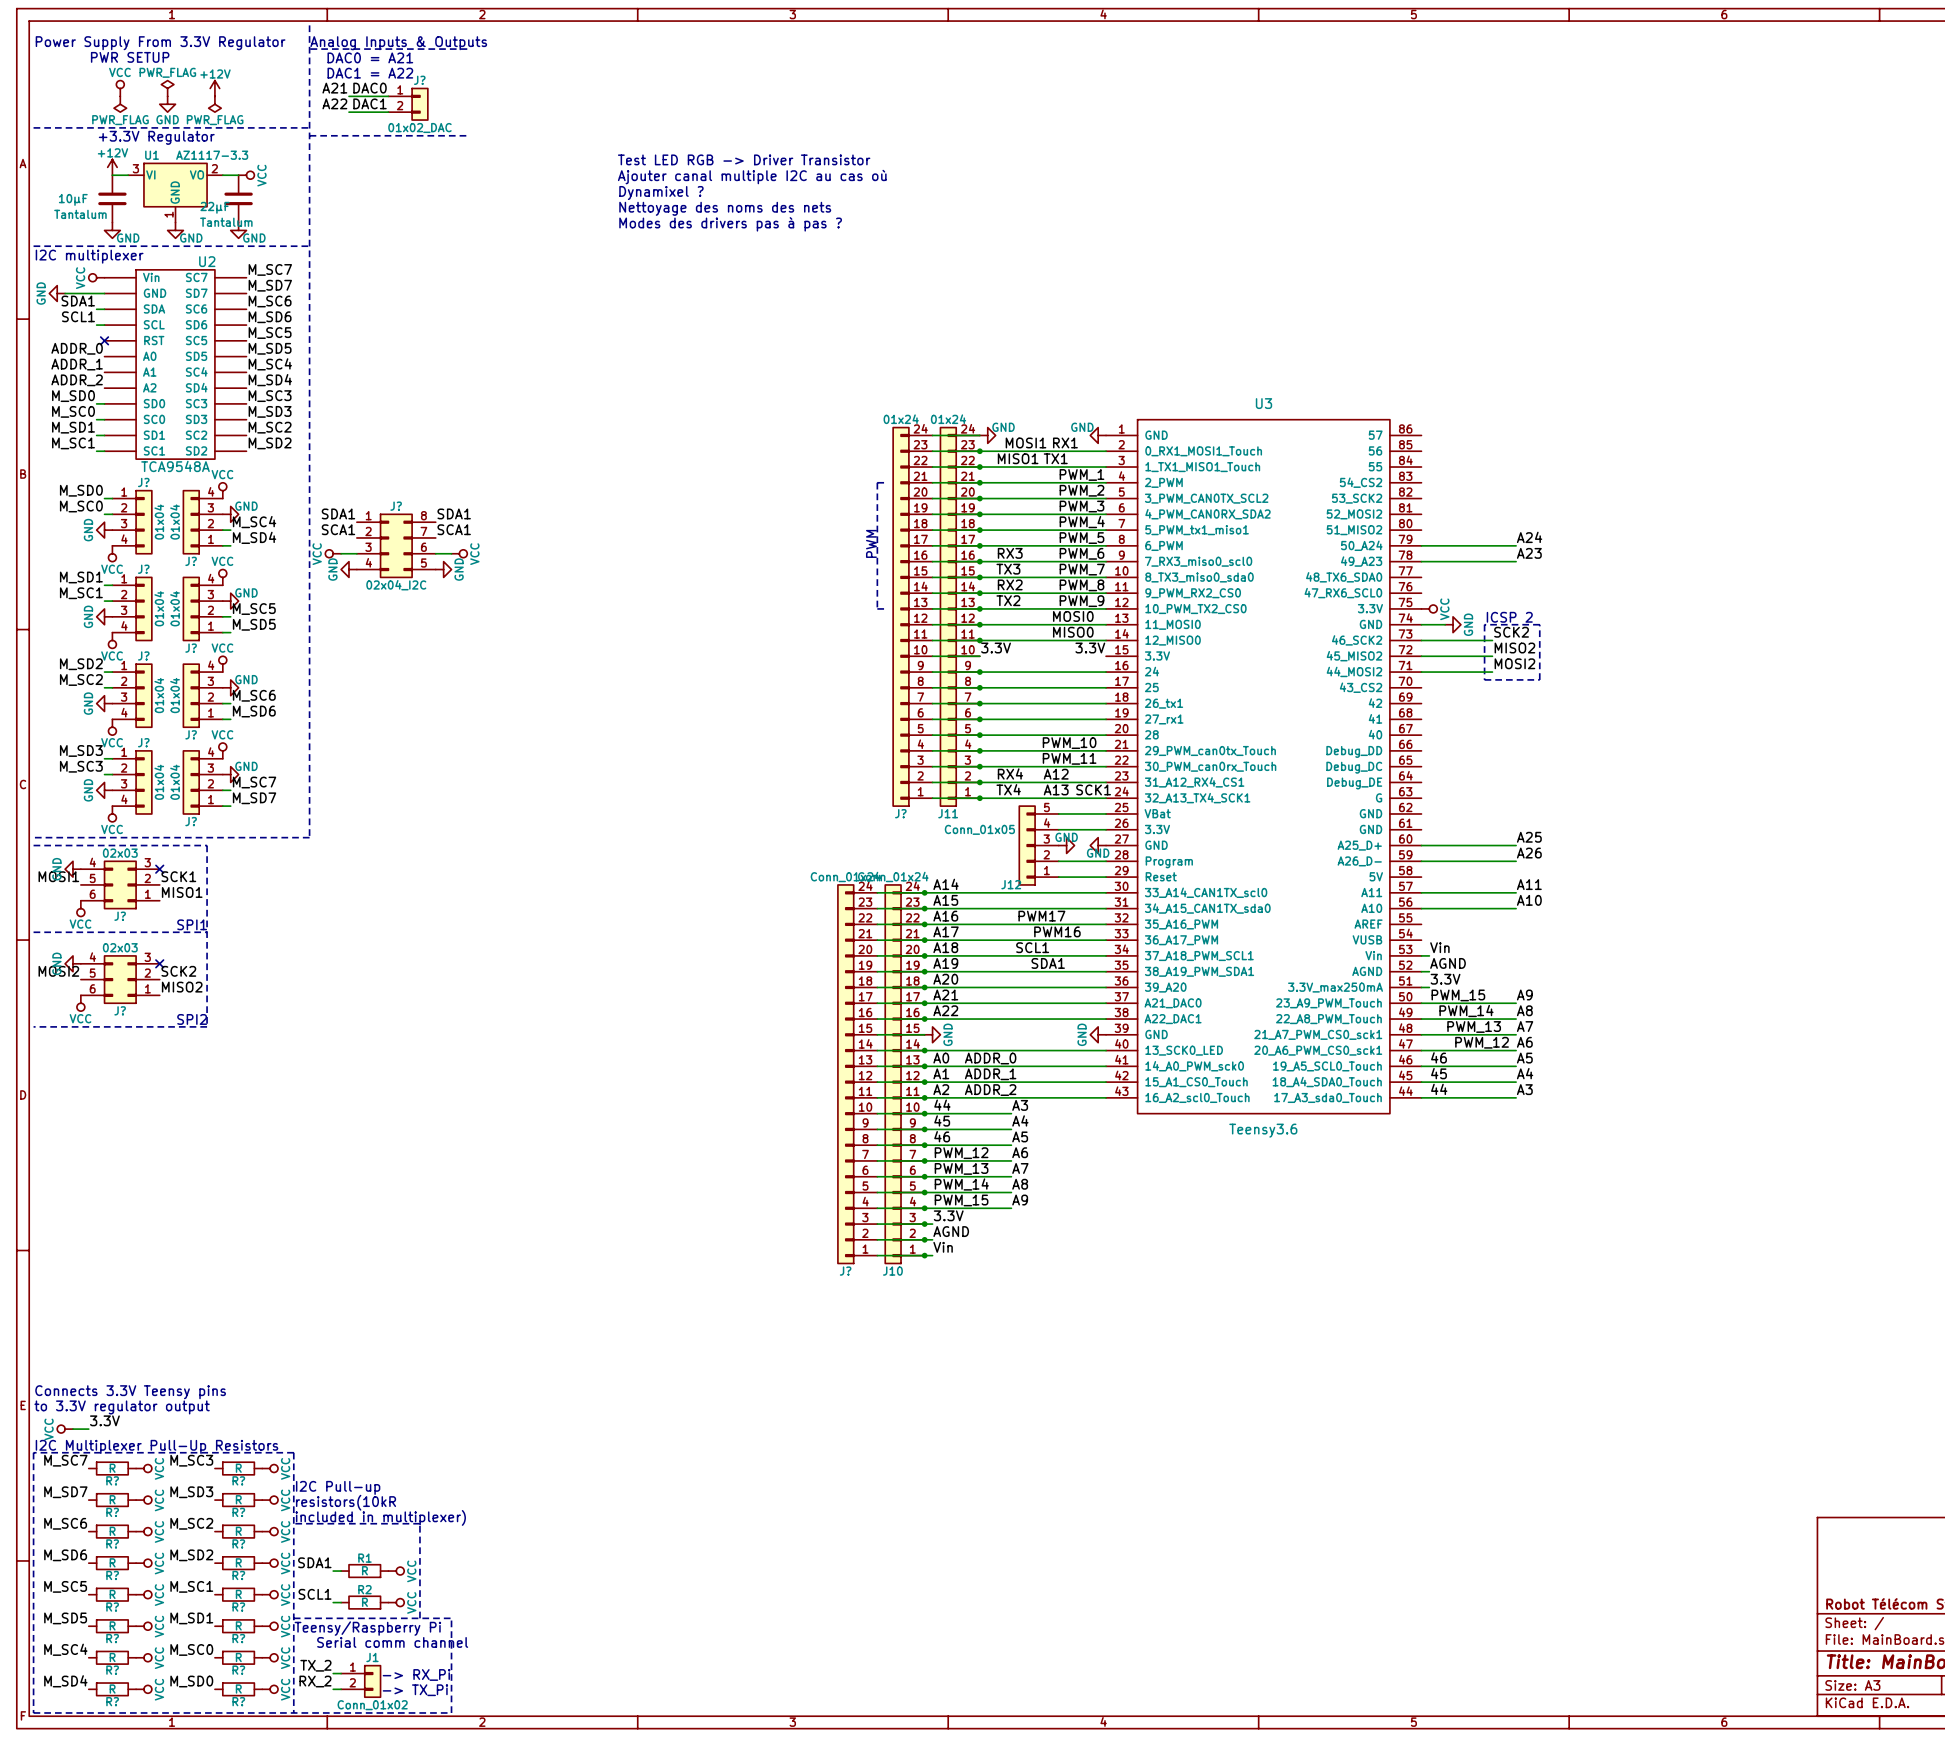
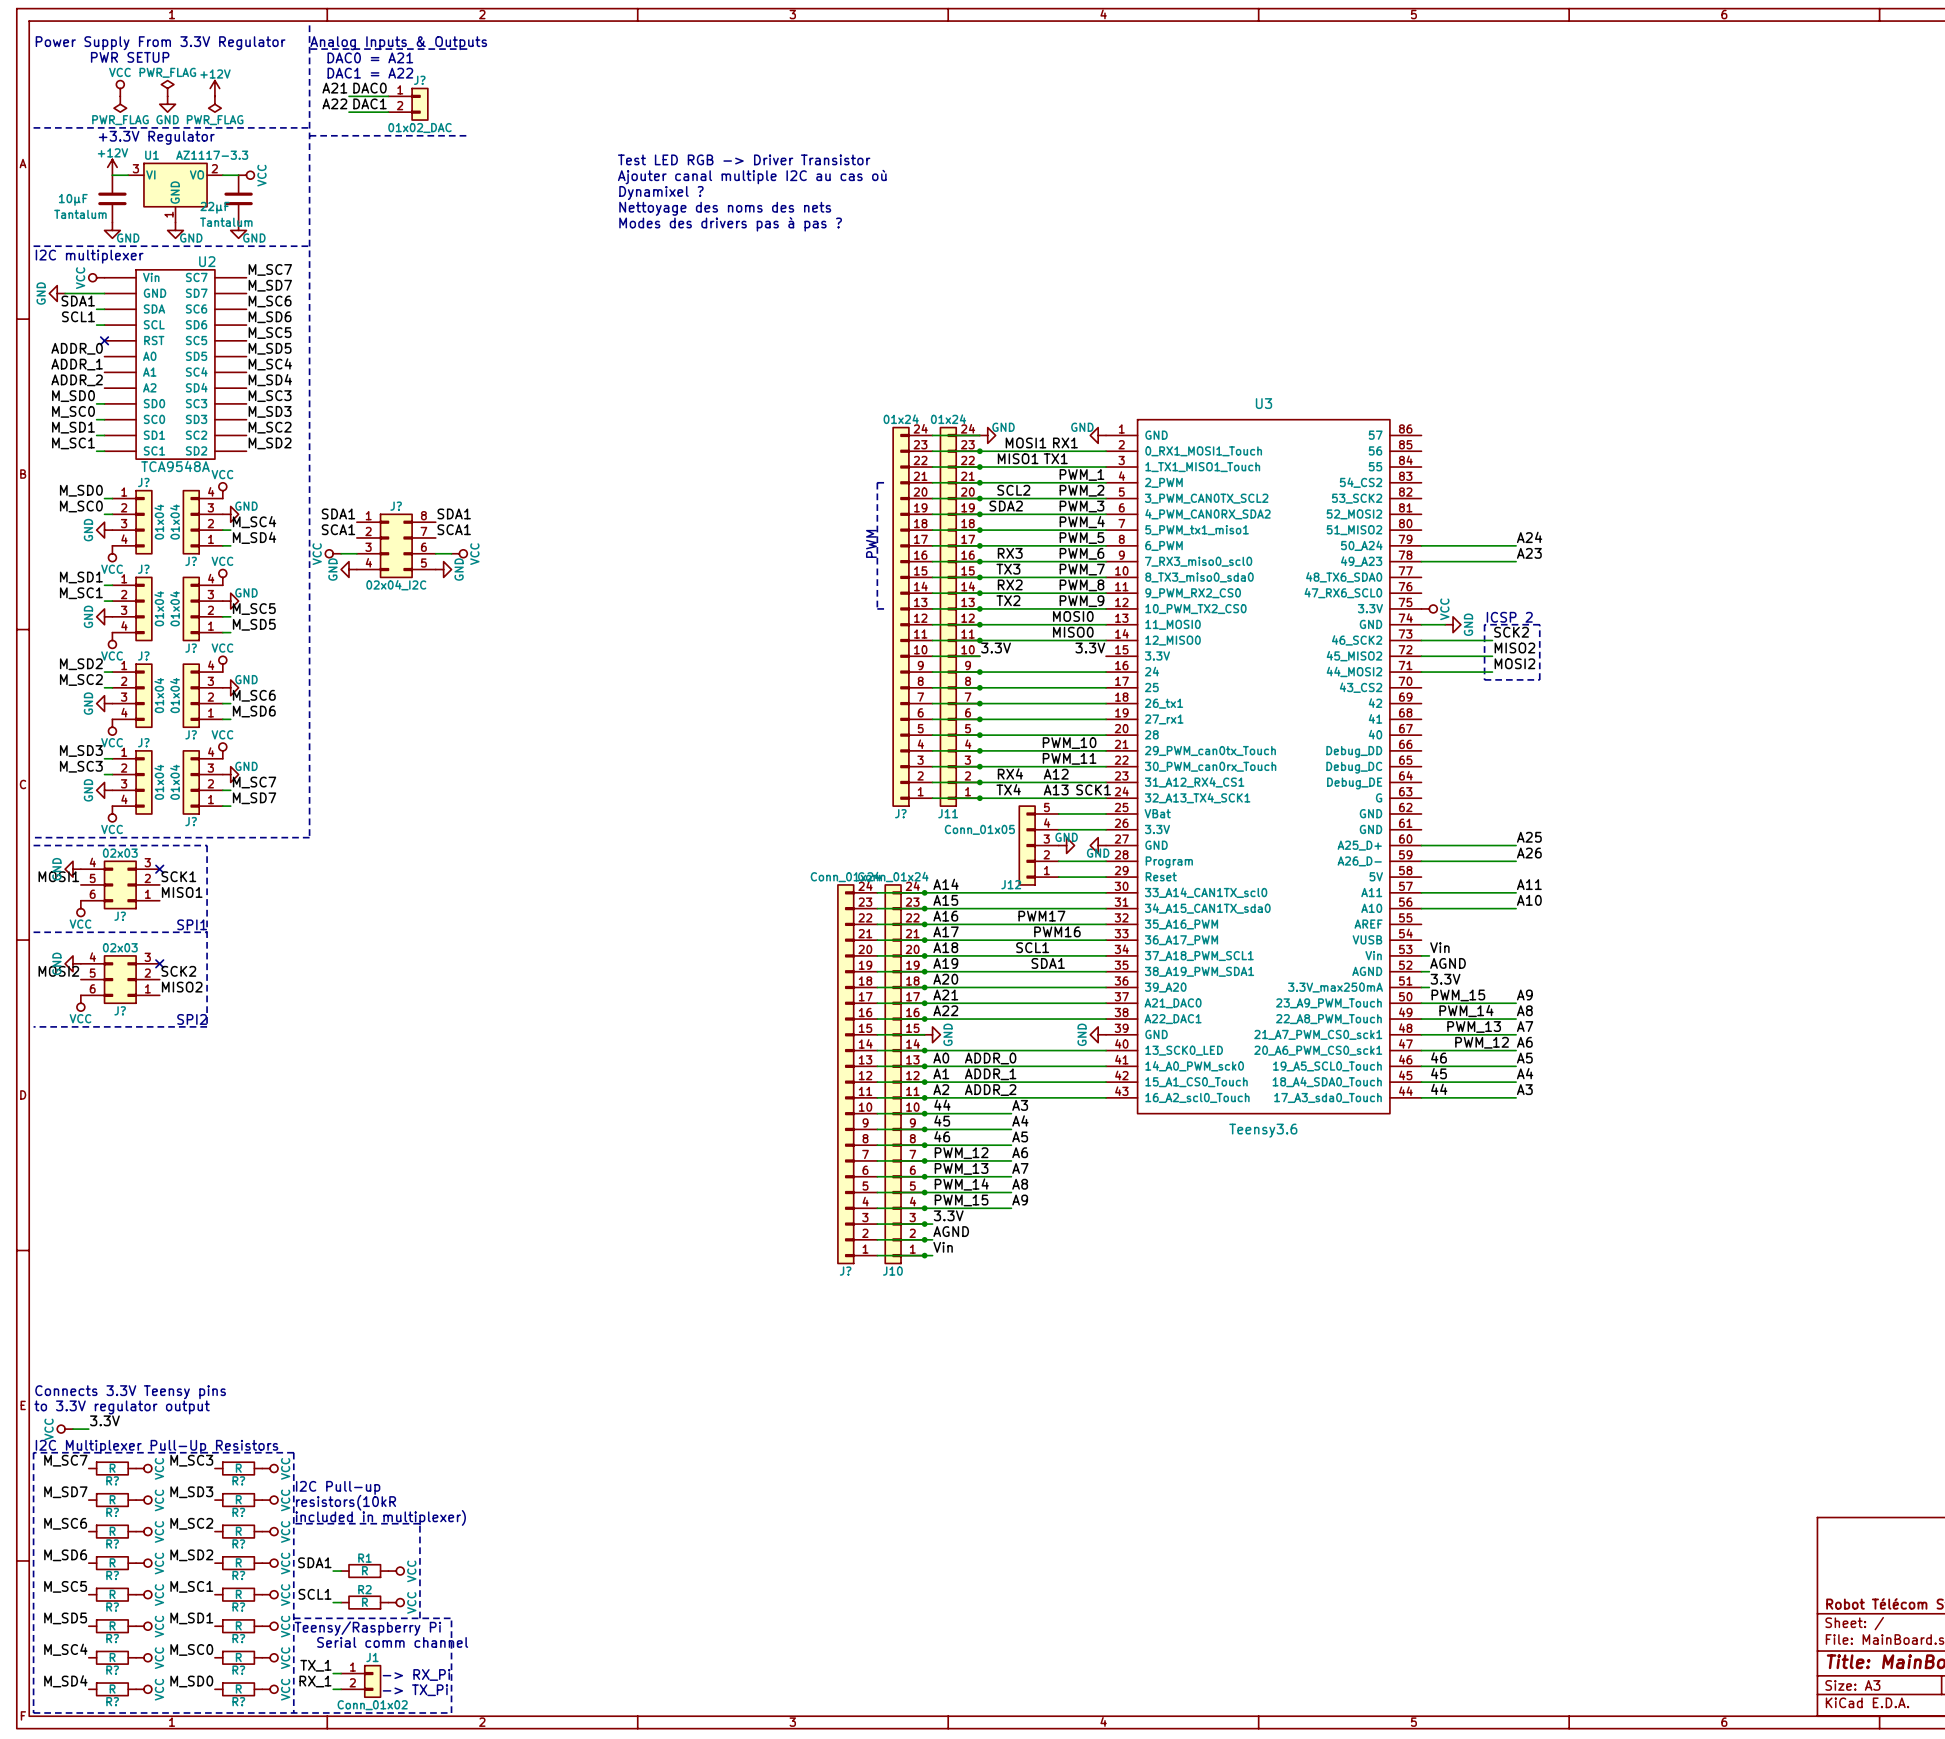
label: none -> SCL2 (1013, 490)
label: none -> SDA2 (1006, 506)
label: TX_2 (315, 1665) -> TX_1 (315, 1665)
label: RX_2 (315, 1681) -> RX_1 (315, 1681)

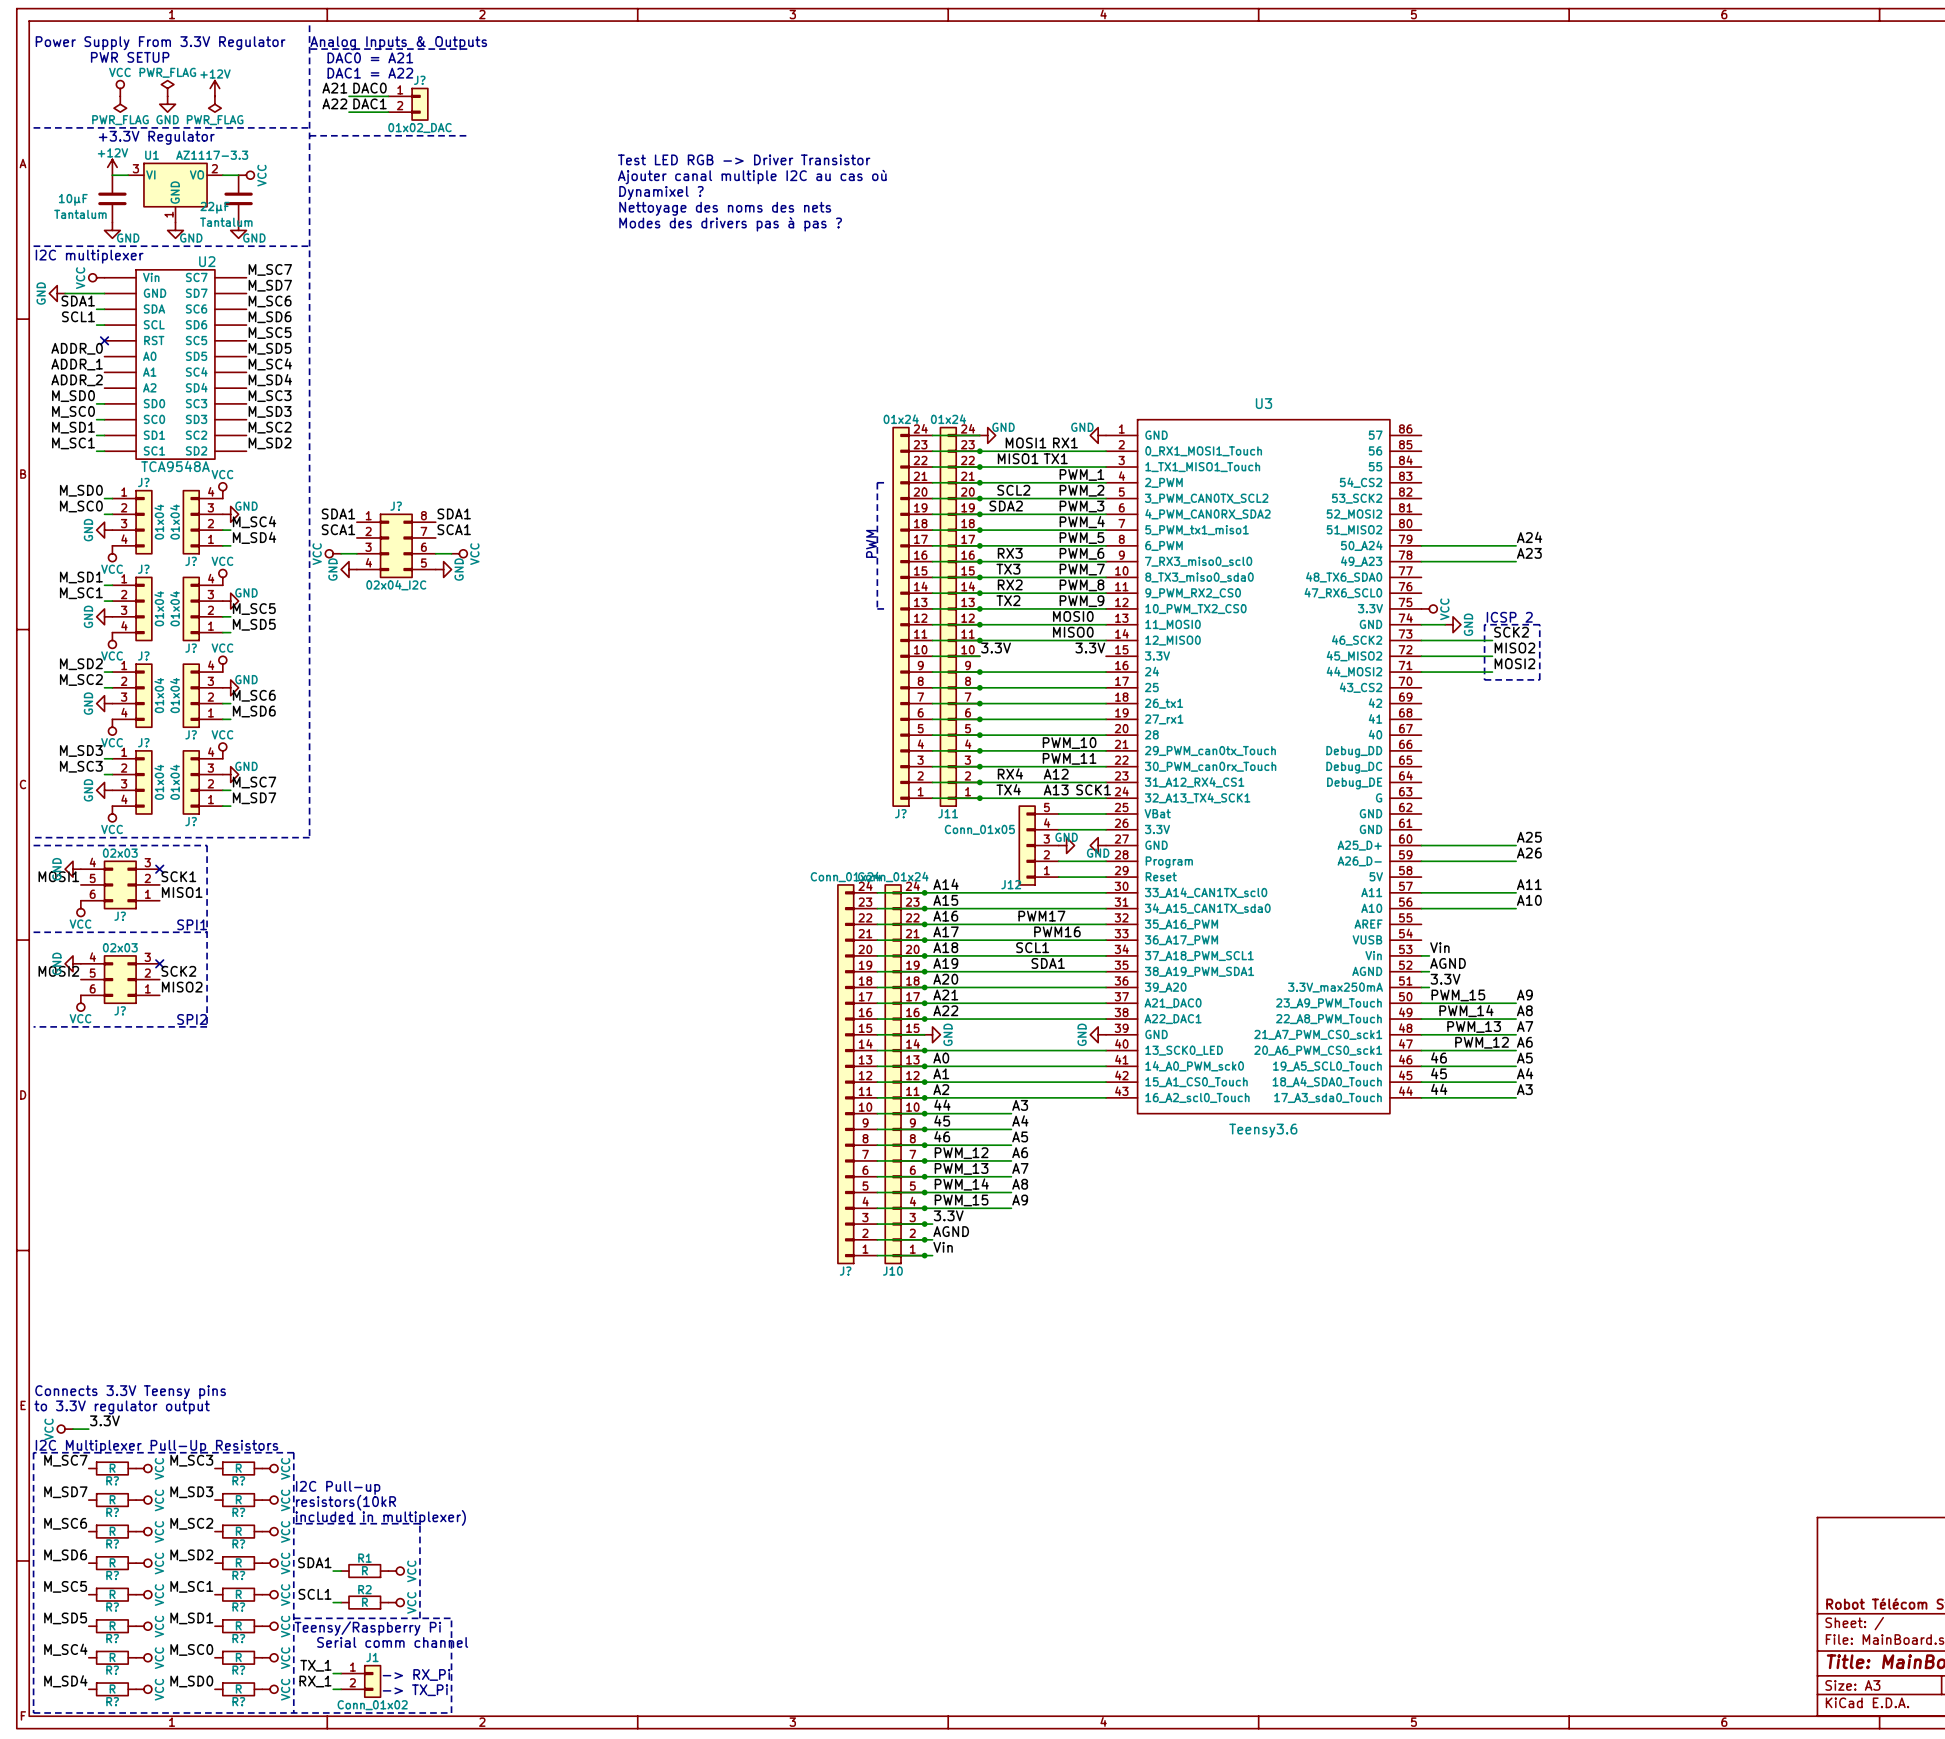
label: ADDR_0 (990, 1058) -> none
label: ADDR_1 (990, 1074) -> none
label: ADDR_2 (990, 1090) -> none

